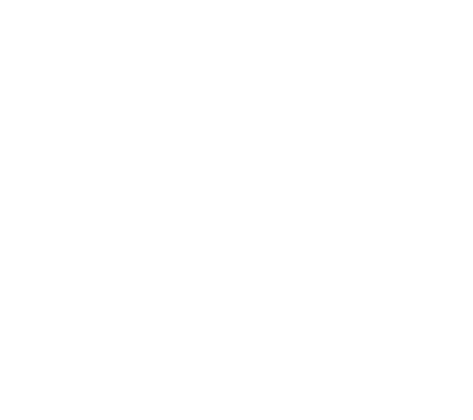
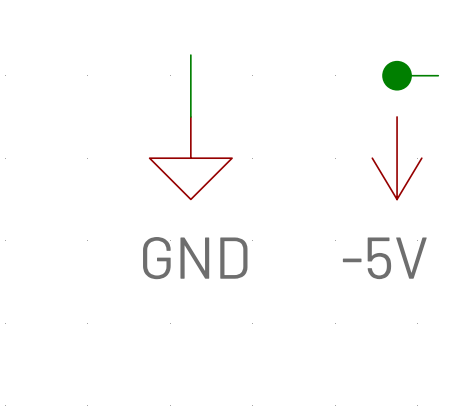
wire: none -> (190, 55) (190, 116)
wire: none -> (397, 75) (438, 75)
junction: none -> (397, 75)
power symbol: none -> GND (190, 158)
power symbol: none -> -5V (397, 158)

